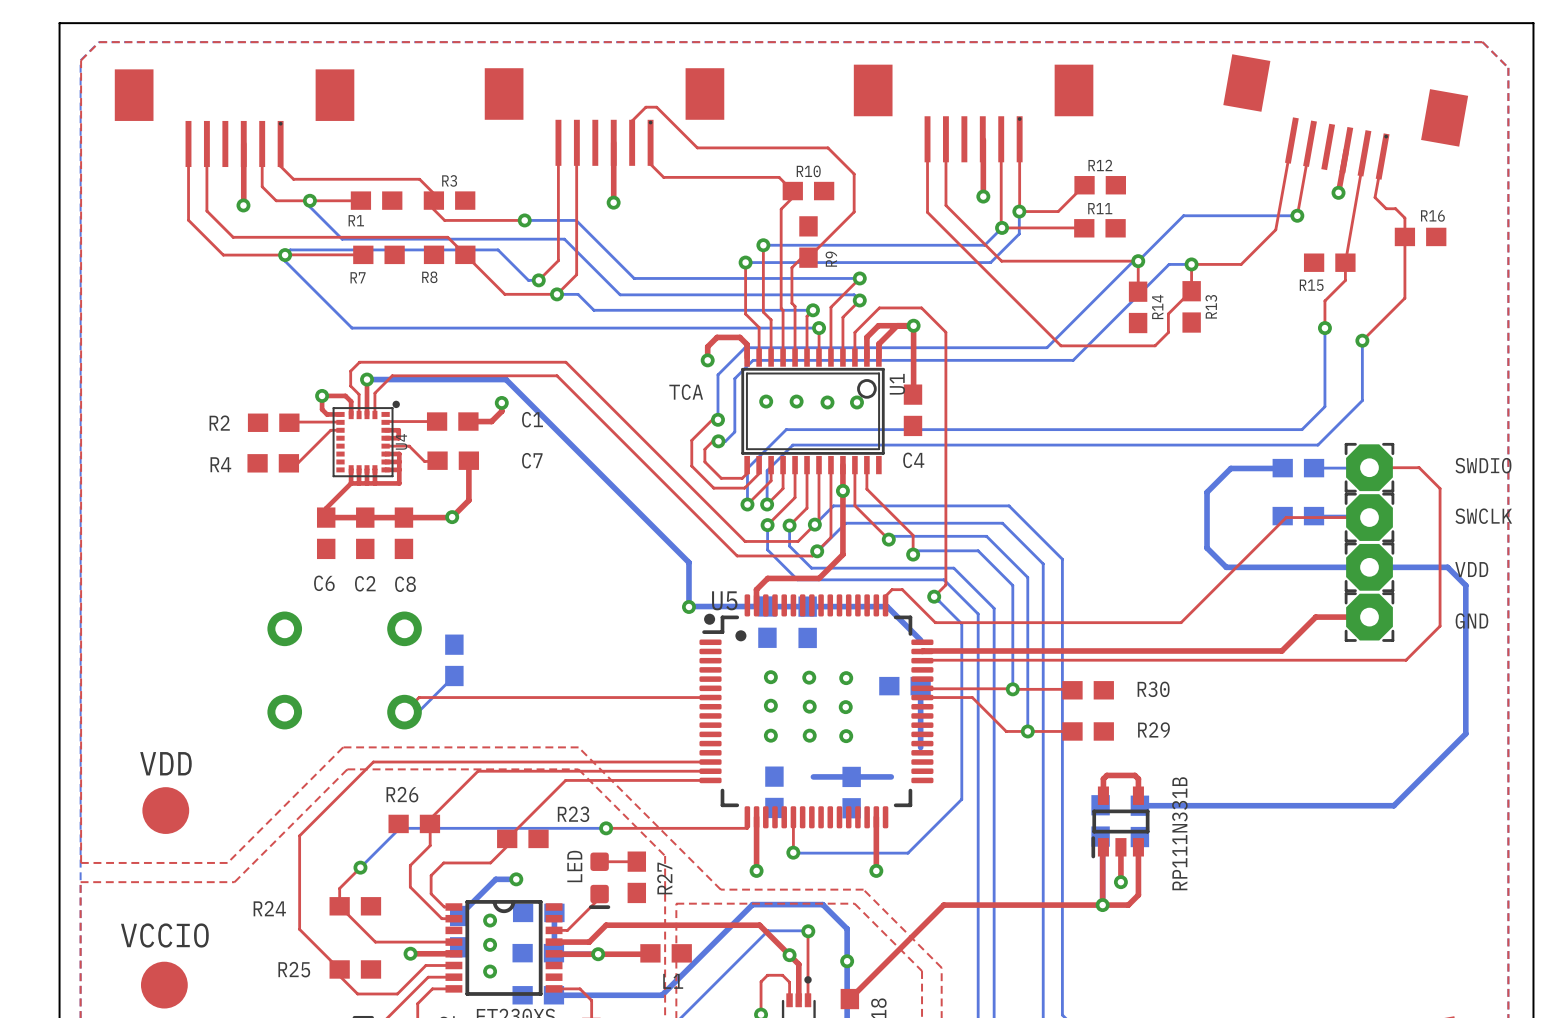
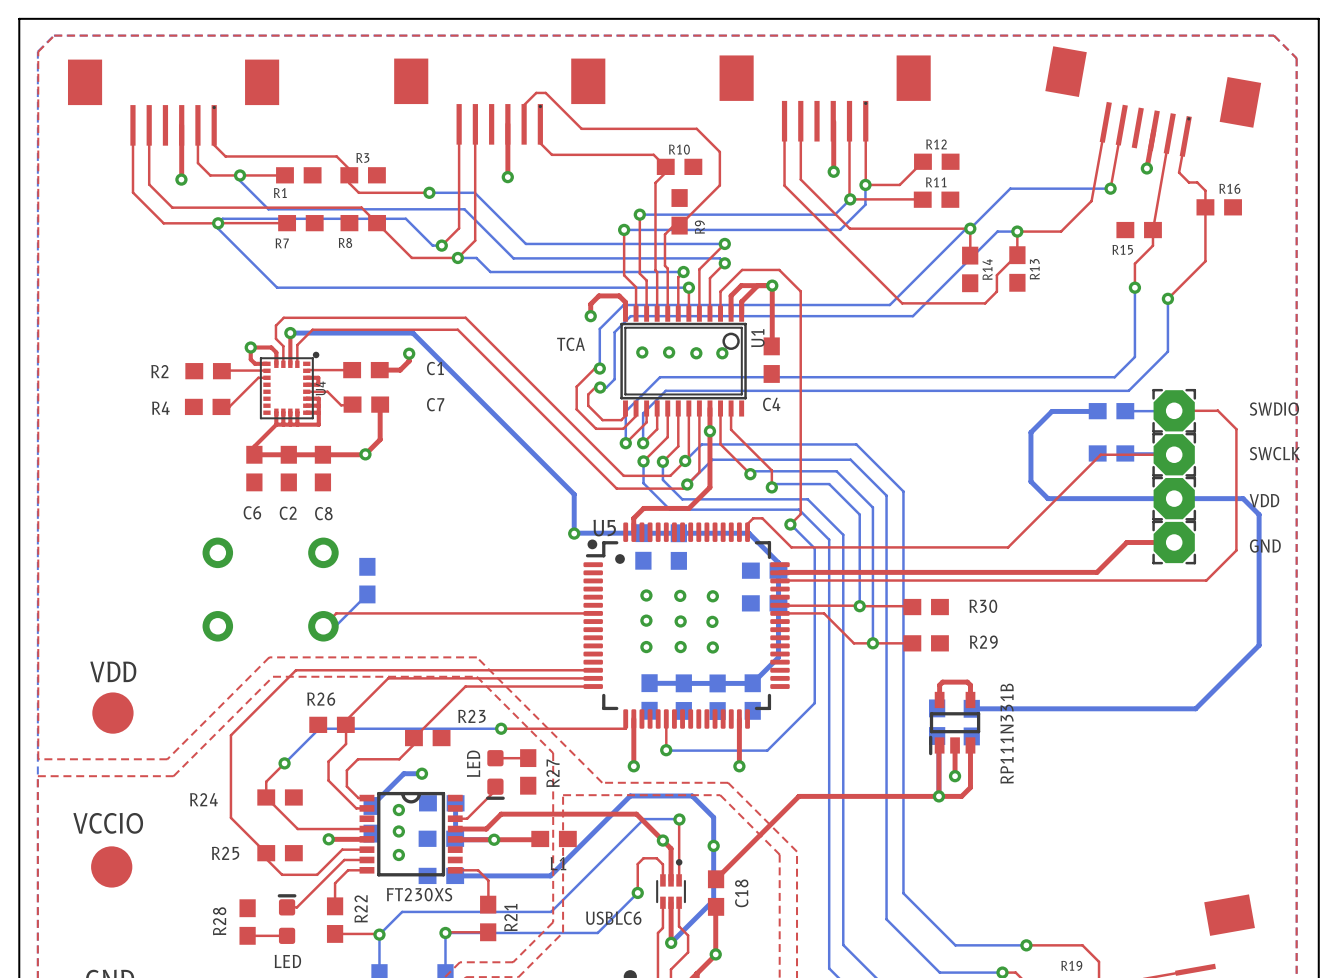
part: none -> (764, 570)
bottom track: none -> (778, 657) (752, 683)
part: none -> (683, 697)
part: none -> (752, 697)

